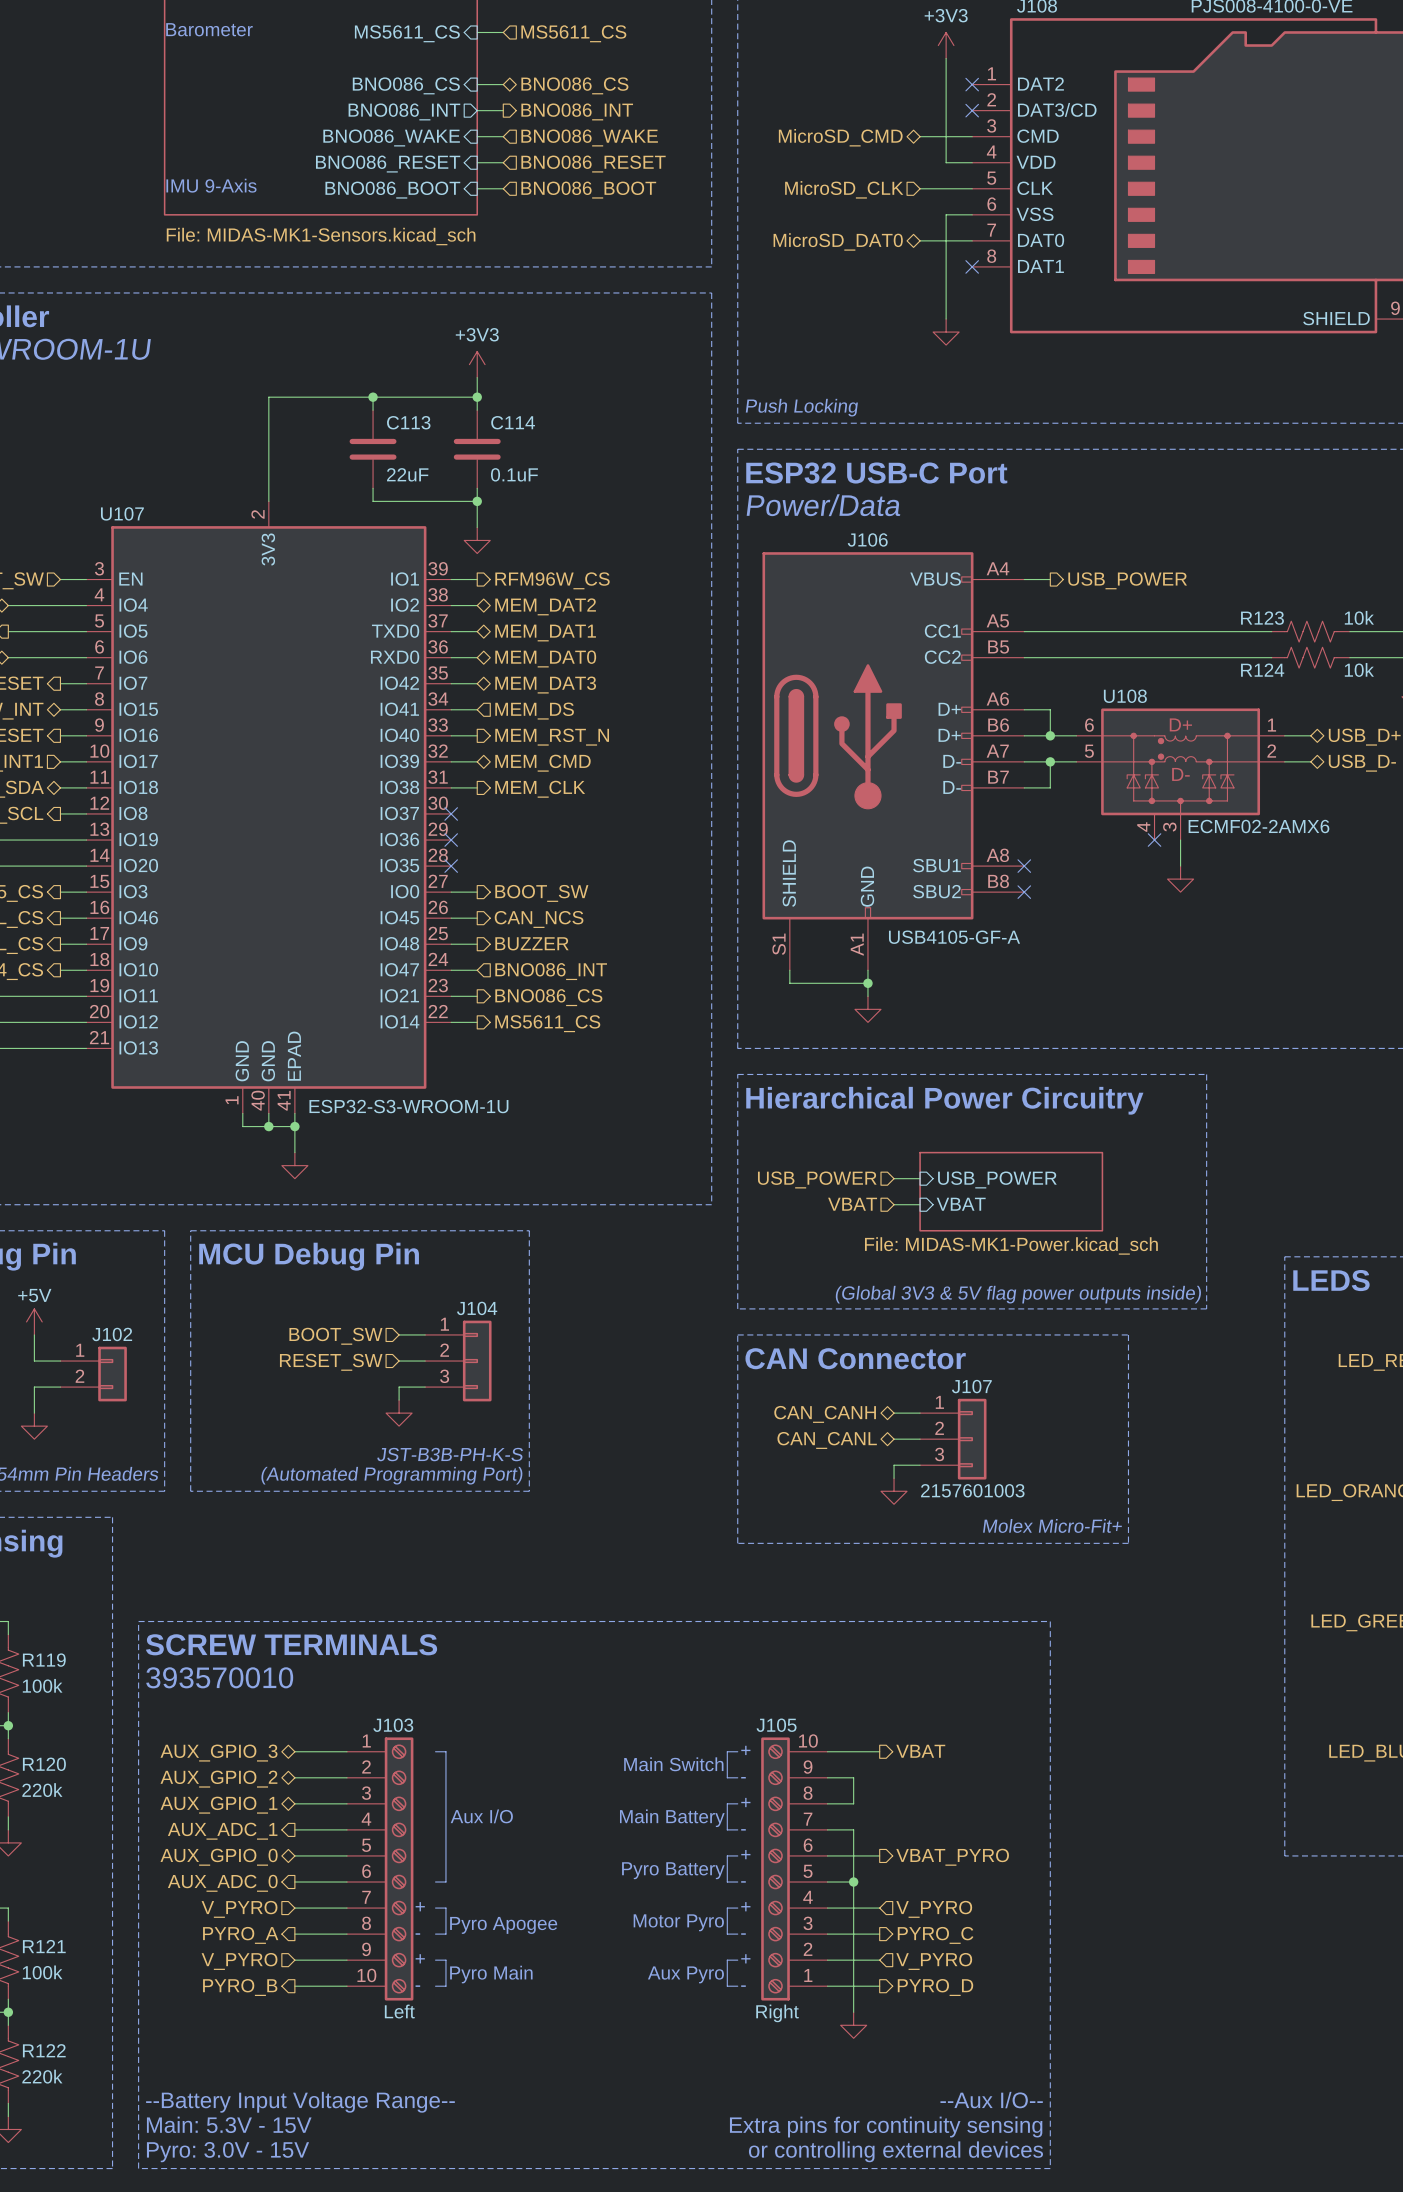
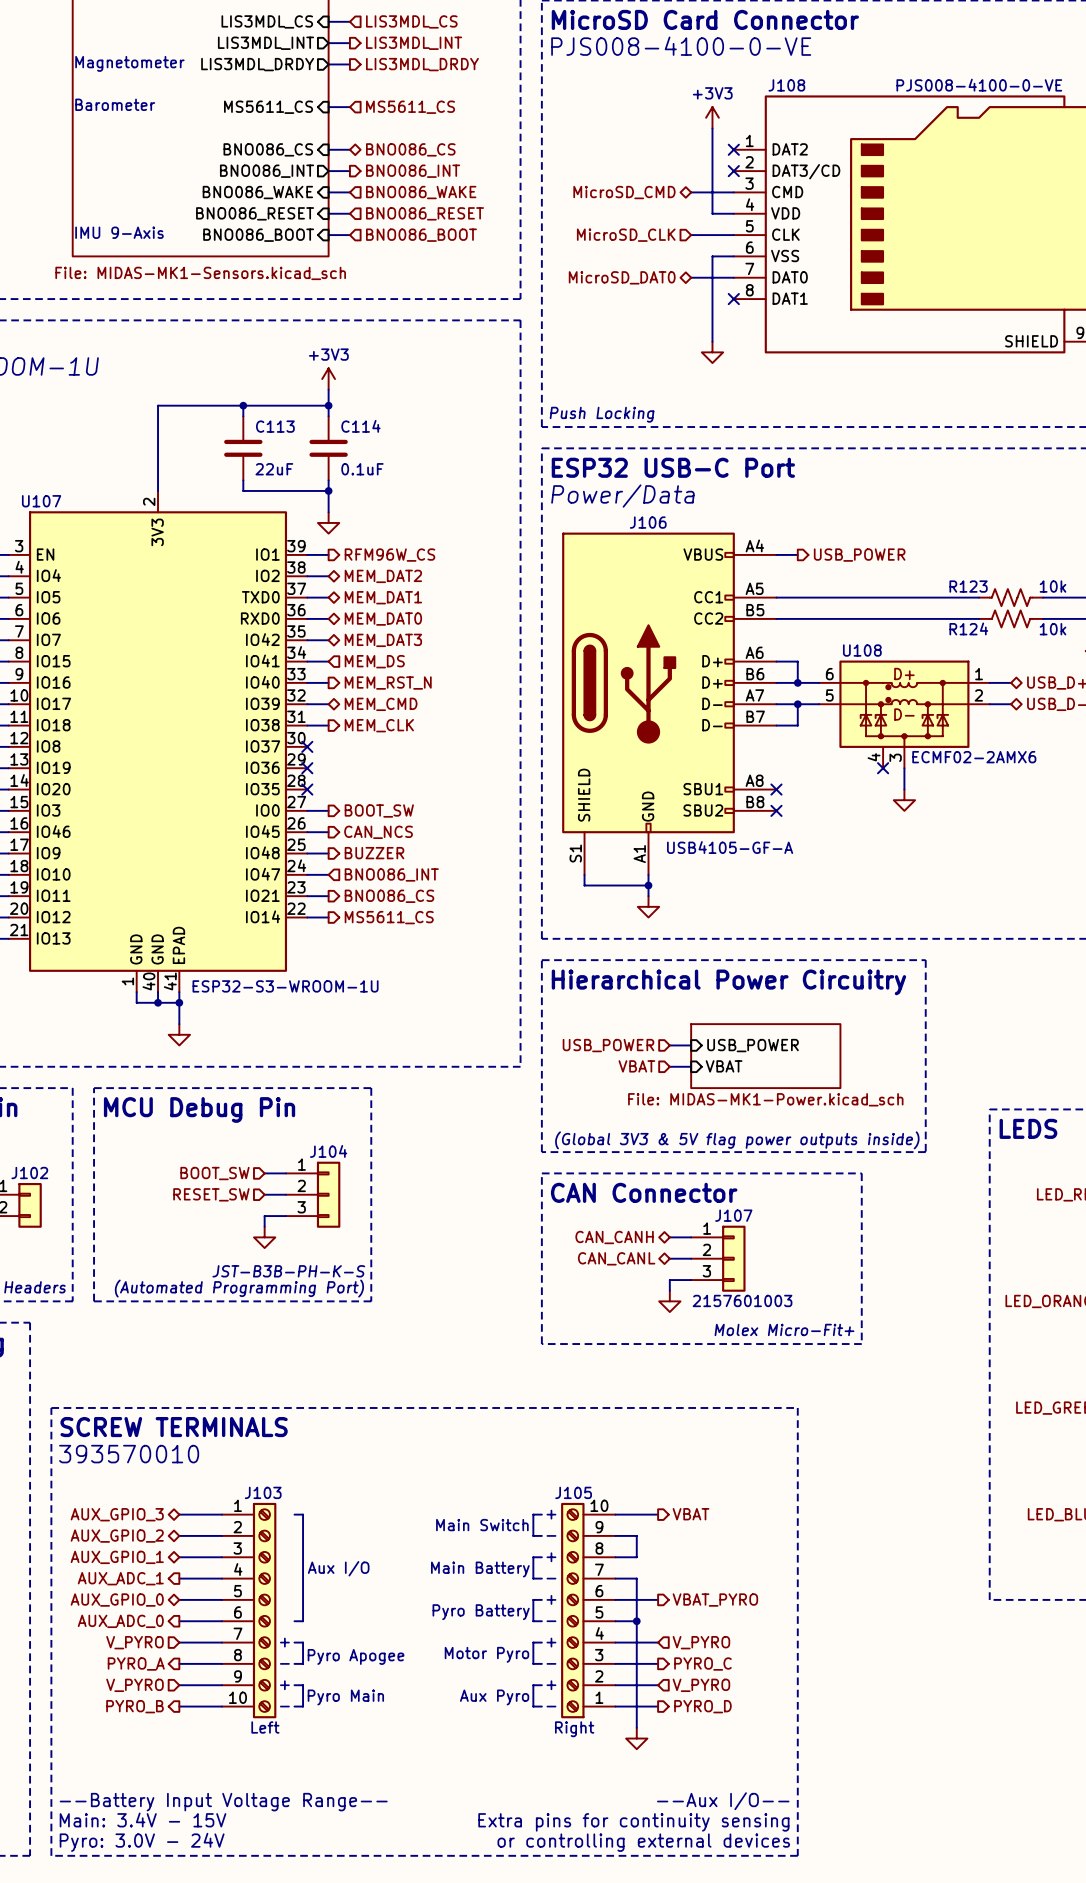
text: Main: 5.3V - 15V (229, 2124) -> Main: 3.4V - 15V (143, 1819)
text: Pyro: 3.0V - 15V (228, 2152) -> Pyro: 3.0V - 24V (142, 1842)

